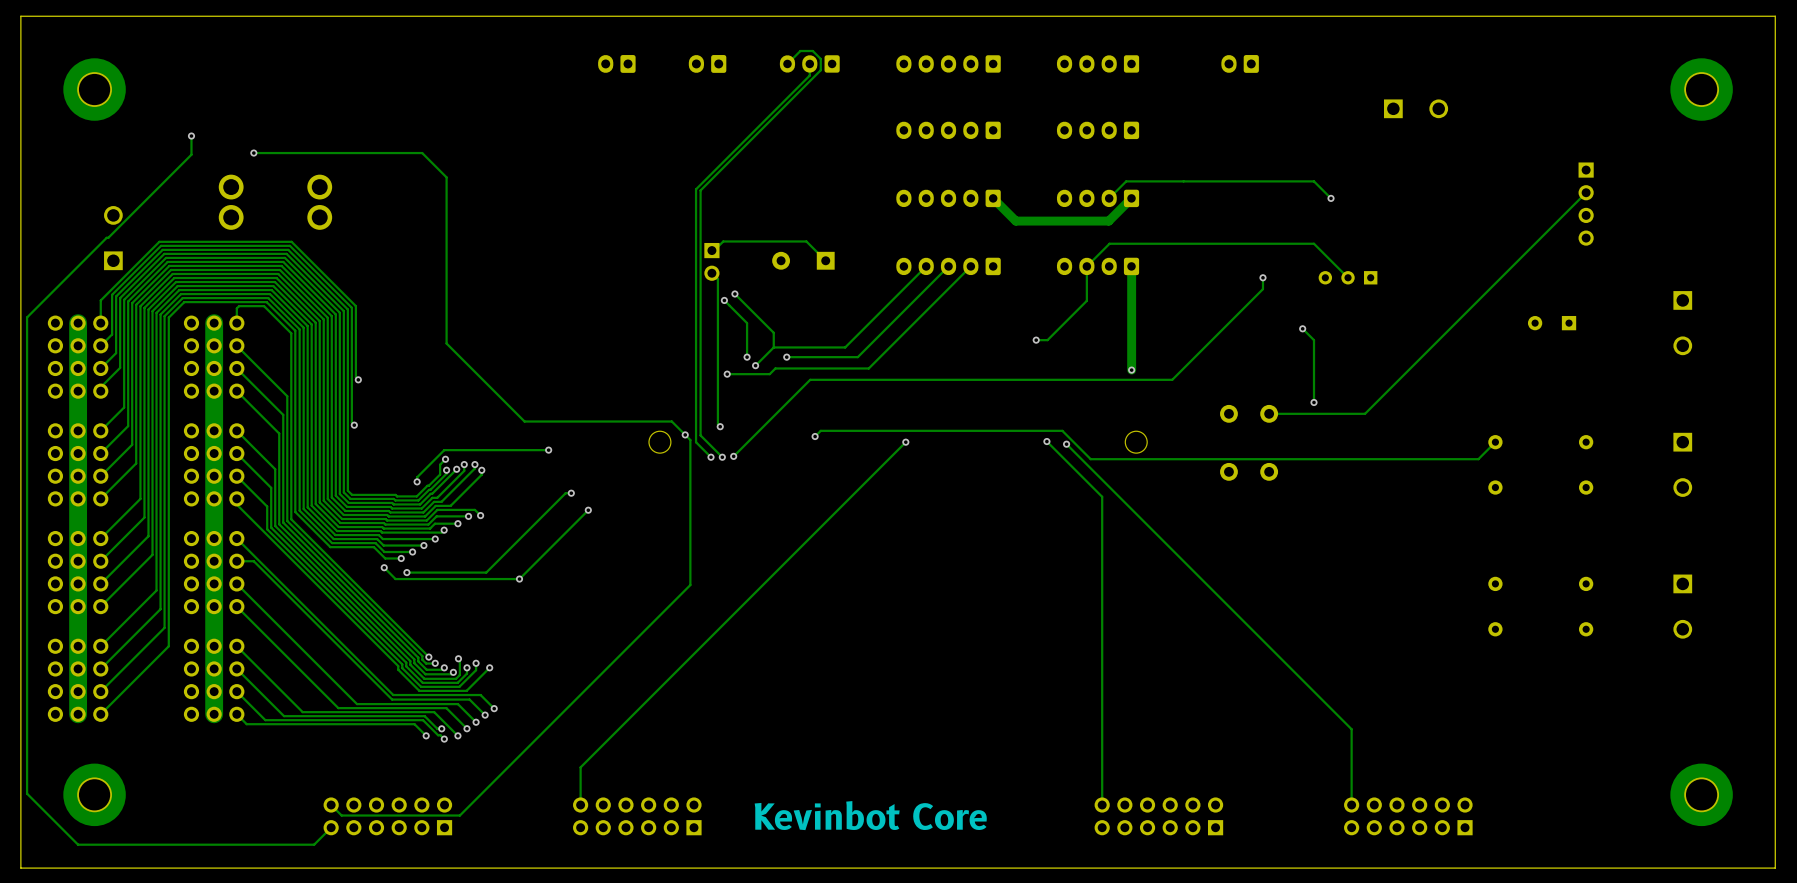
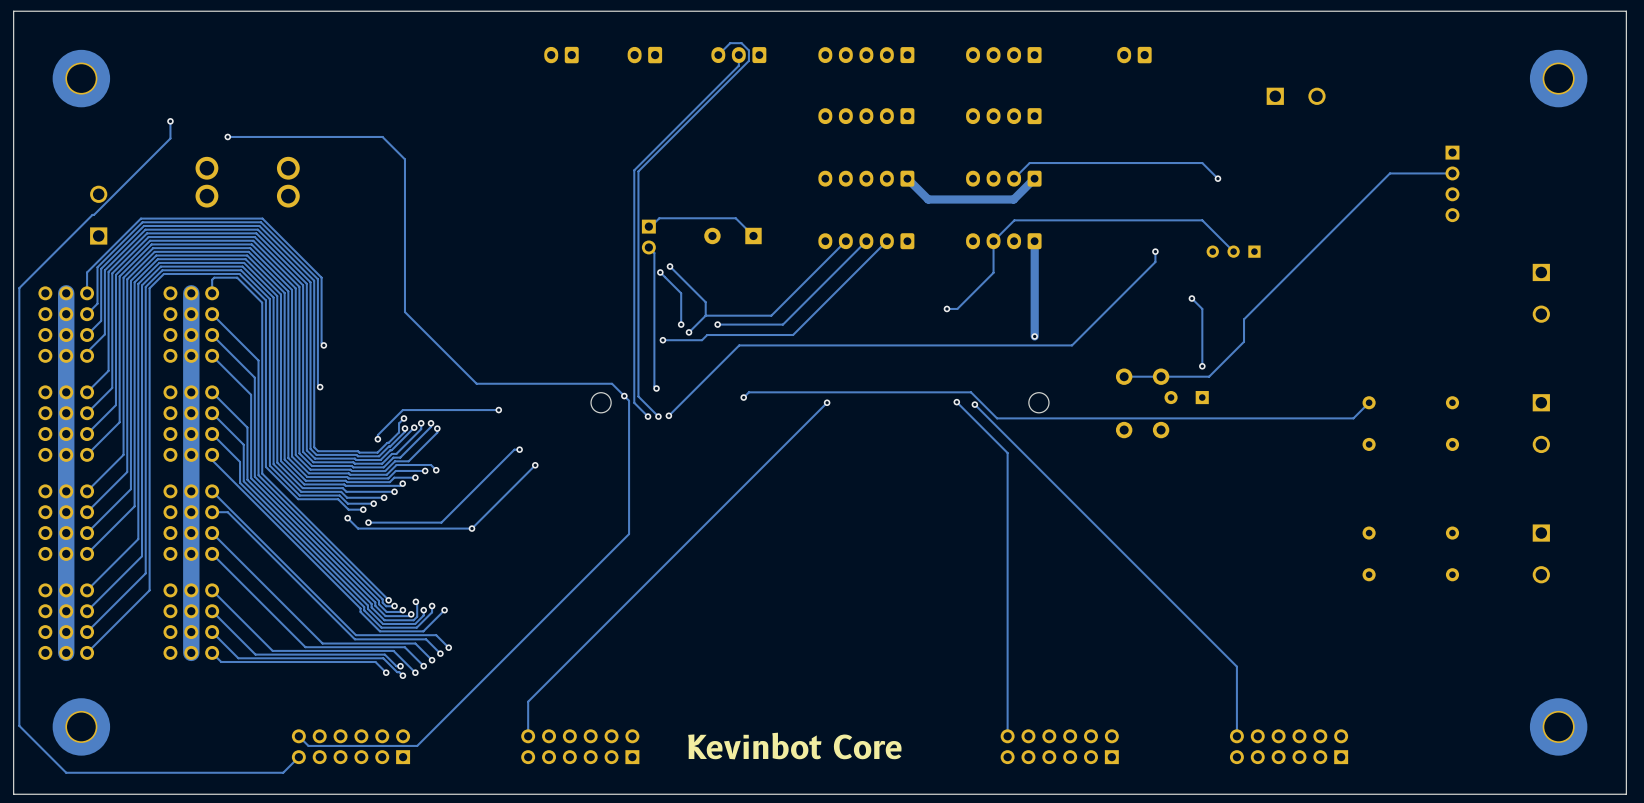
track: (1586, 192) (1365, 413) (1321, 413) -> (1452, 173) (1389, 173) (1244, 319) (1244, 341) (1209, 376)
part: (1552, 323) -> none
track: none -> (1161, 376) (1121, 376)
part: none -> (1186, 397)

